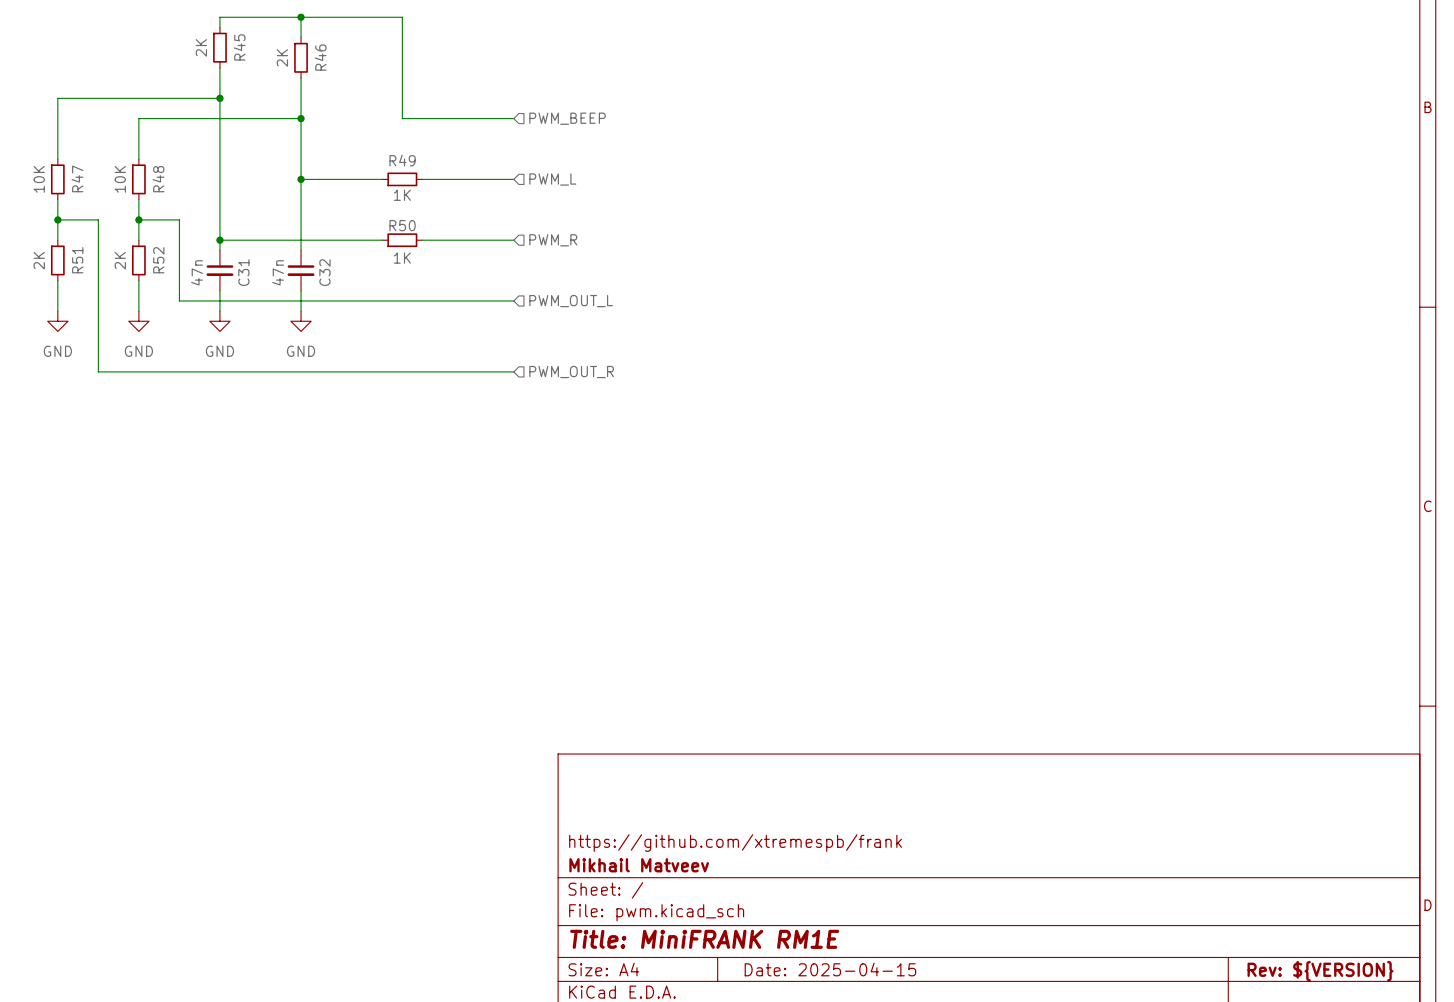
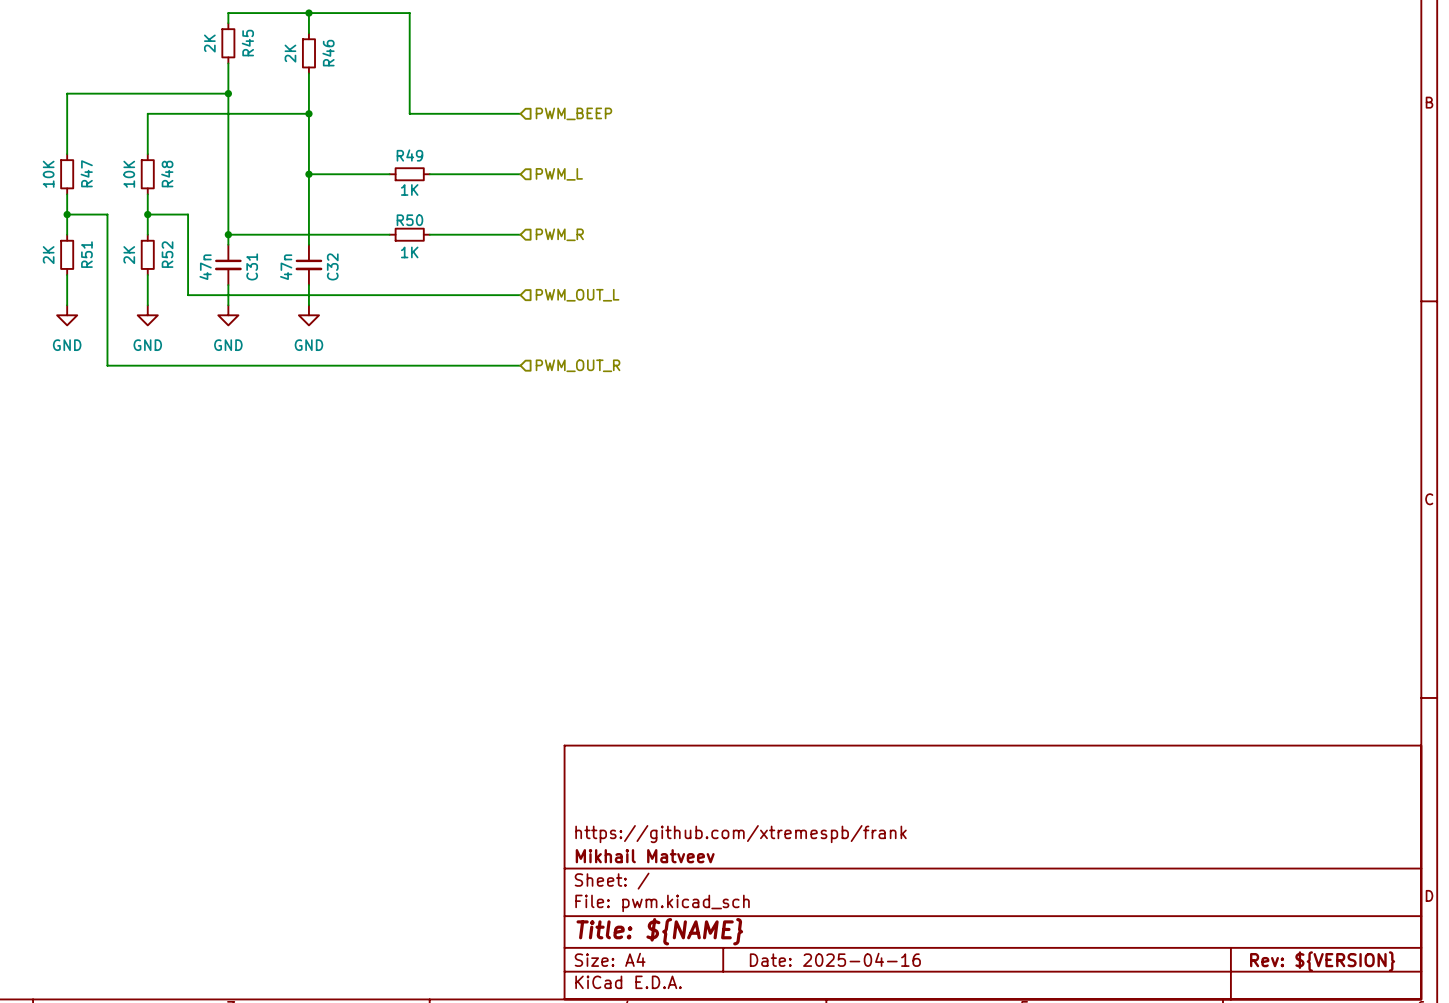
title block: Title: MiniFRANK RM1E (704, 939) -> Title: ${NAME} (659, 931)
title block: Date: 2025-04-15 (830, 969) -> Date: 2025-04-16 (835, 959)

